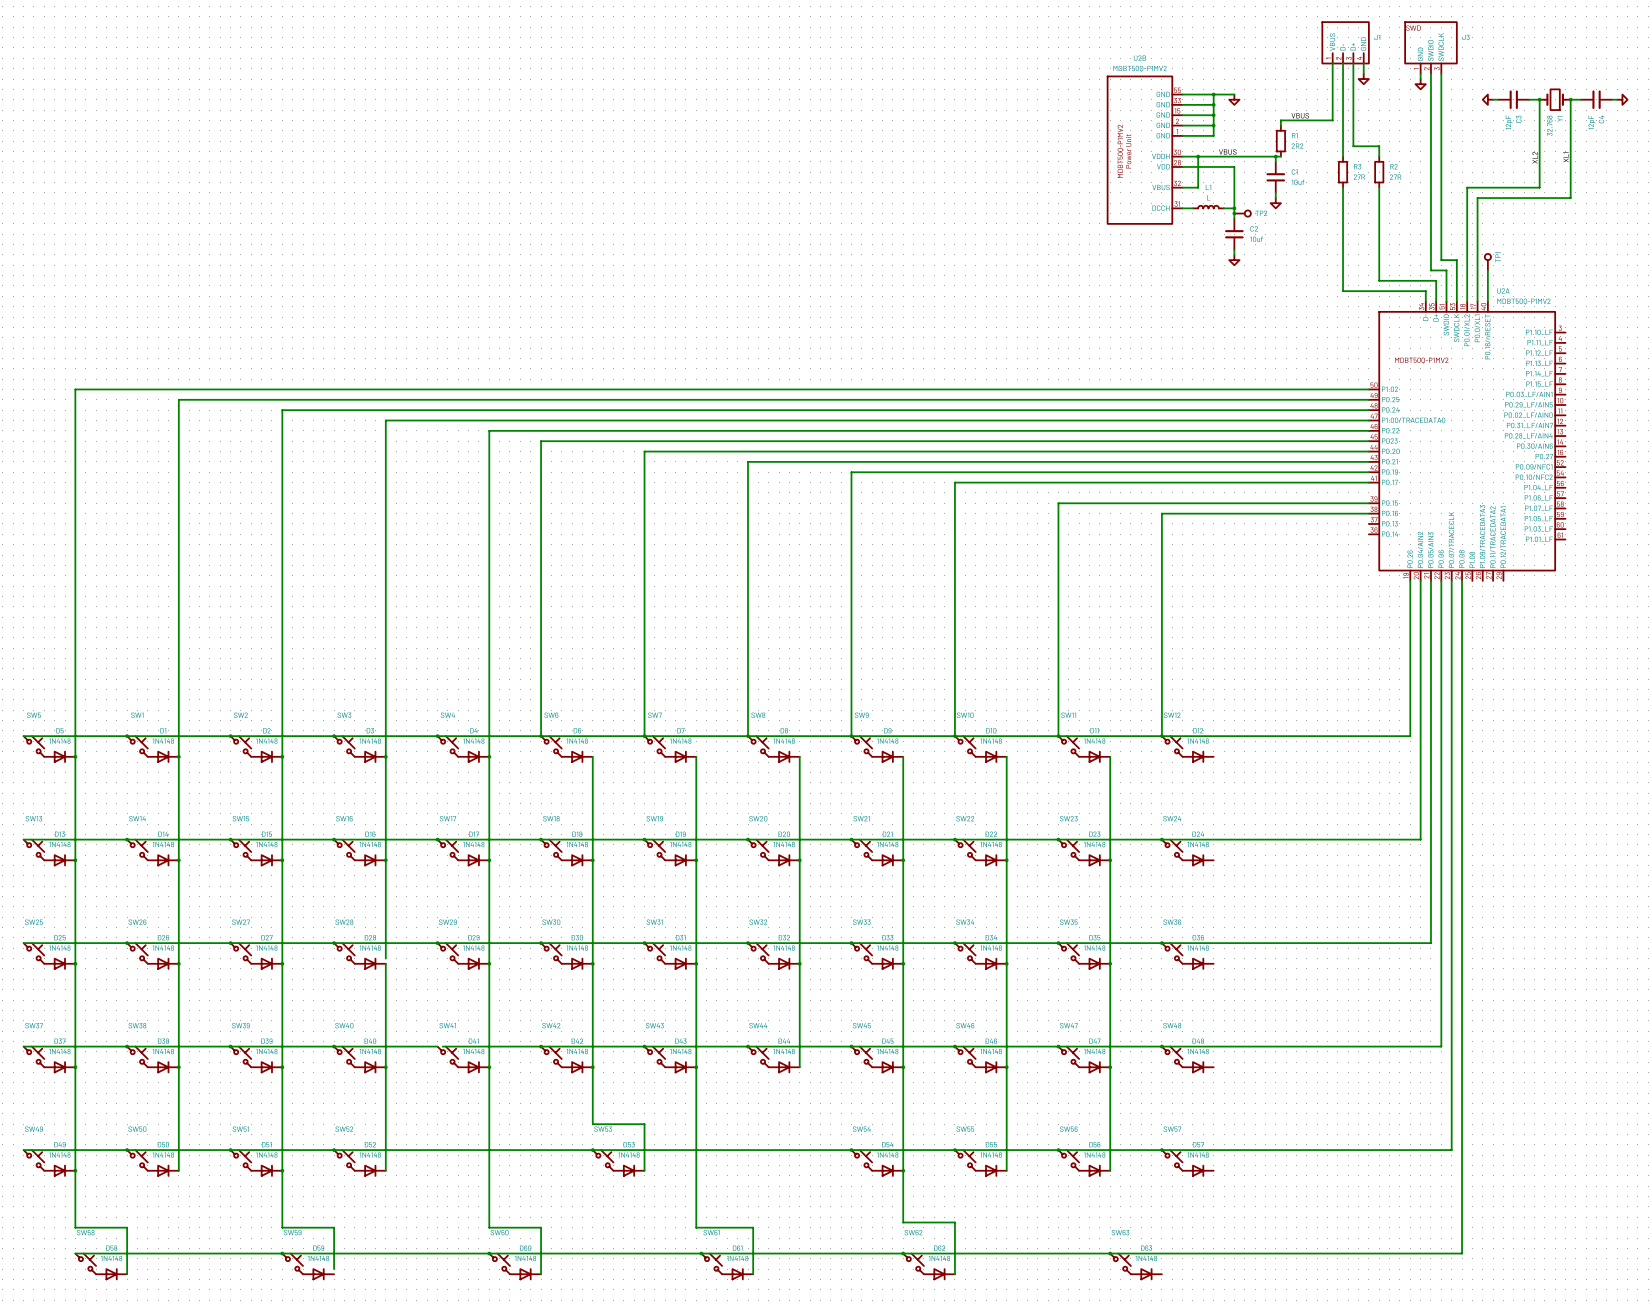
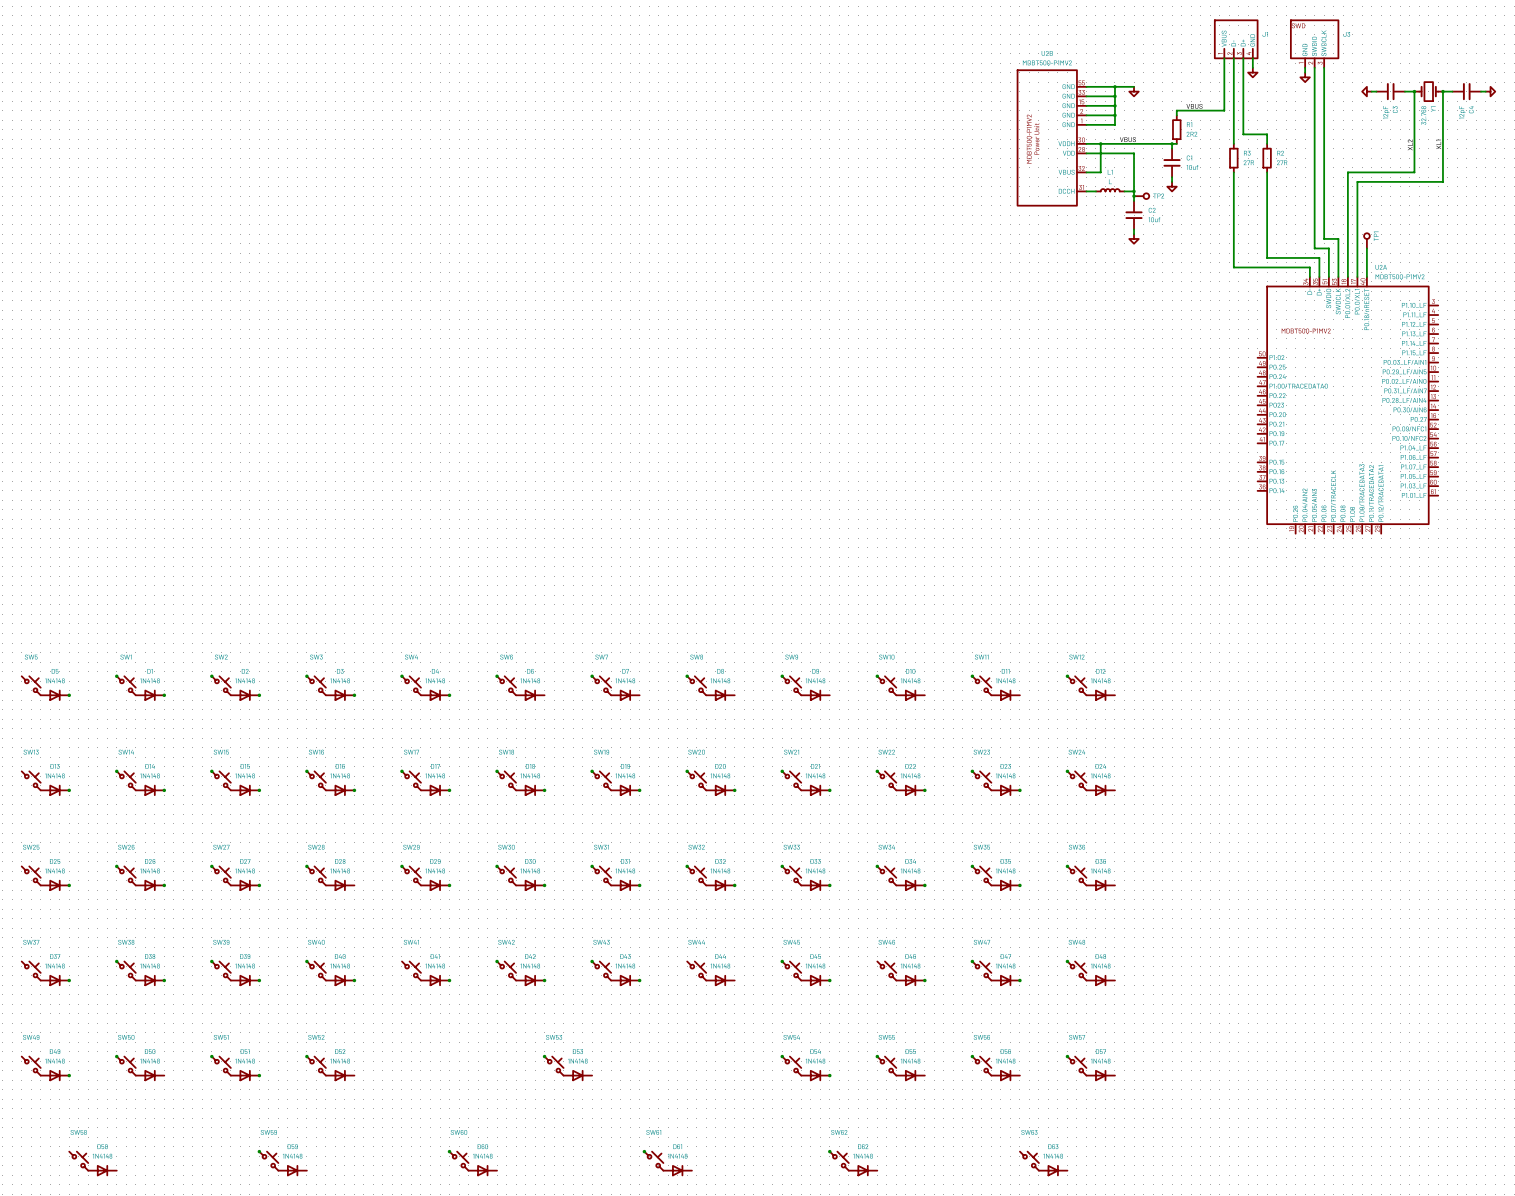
wire: (1368, 389) (75, 389) (75, 1227) (127, 1227) (127, 1274) -> none
wire: (1368, 399) (178, 399) (178, 1170) -> none
wire: (1368, 410) (282, 410) (282, 1227) (334, 1227) (334, 1269) -> none
wire: (1368, 420) (385, 420) (385, 958) -> none
wire: (1368, 430) (489, 430) (489, 1227) (541, 1227) (541, 1274) -> none
wire: (1368, 441) (541, 441) (541, 736) -> none
wire: (1368, 451) (644, 451) (644, 736) -> none
wire: (1368, 461) (748, 461) (748, 736) -> none
wire: (1368, 472) (851, 472) (851, 736) -> none
wire: (1368, 482) (954, 482) (954, 736) -> none
wire: (1368, 503) (1058, 503) (1058, 736) -> none
wire: (1368, 513) (1161, 513) (1161, 736) -> none
wire: (1410, 580) (1410, 736) (23, 736) -> none
wire: (1420, 580) (1420, 839) (23, 839) -> none
wire: (1430, 580) (1430, 943) (23, 943) -> none
wire: (1441, 580) (1441, 1046) (442, 1046) -> none
wire: (1451, 580) (1451, 1150) (23, 1150) -> none
wire: (1462, 580) (1462, 1253) (75, 1253) -> none
wire: (592, 756) (592, 1124) (644, 1124) (644, 1170) -> none
wire: (696, 756) (696, 1227) (753, 1227) (753, 1274) -> none
wire: (799, 756) (799, 1067) -> none
wire: (903, 756) (903, 1222) (954, 1222) (954, 1274) -> none
wire: (1006, 756) (1006, 1170) -> none
wire: (1110, 756) (1110, 1170) -> none
wire: (385, 963) (385, 1170) -> none
wire: (23, 1046) (437, 1046) -> none
junction: (748, 1046) -> none
junction: (954, 1046) -> none
junction: (1110, 1253) -> none

